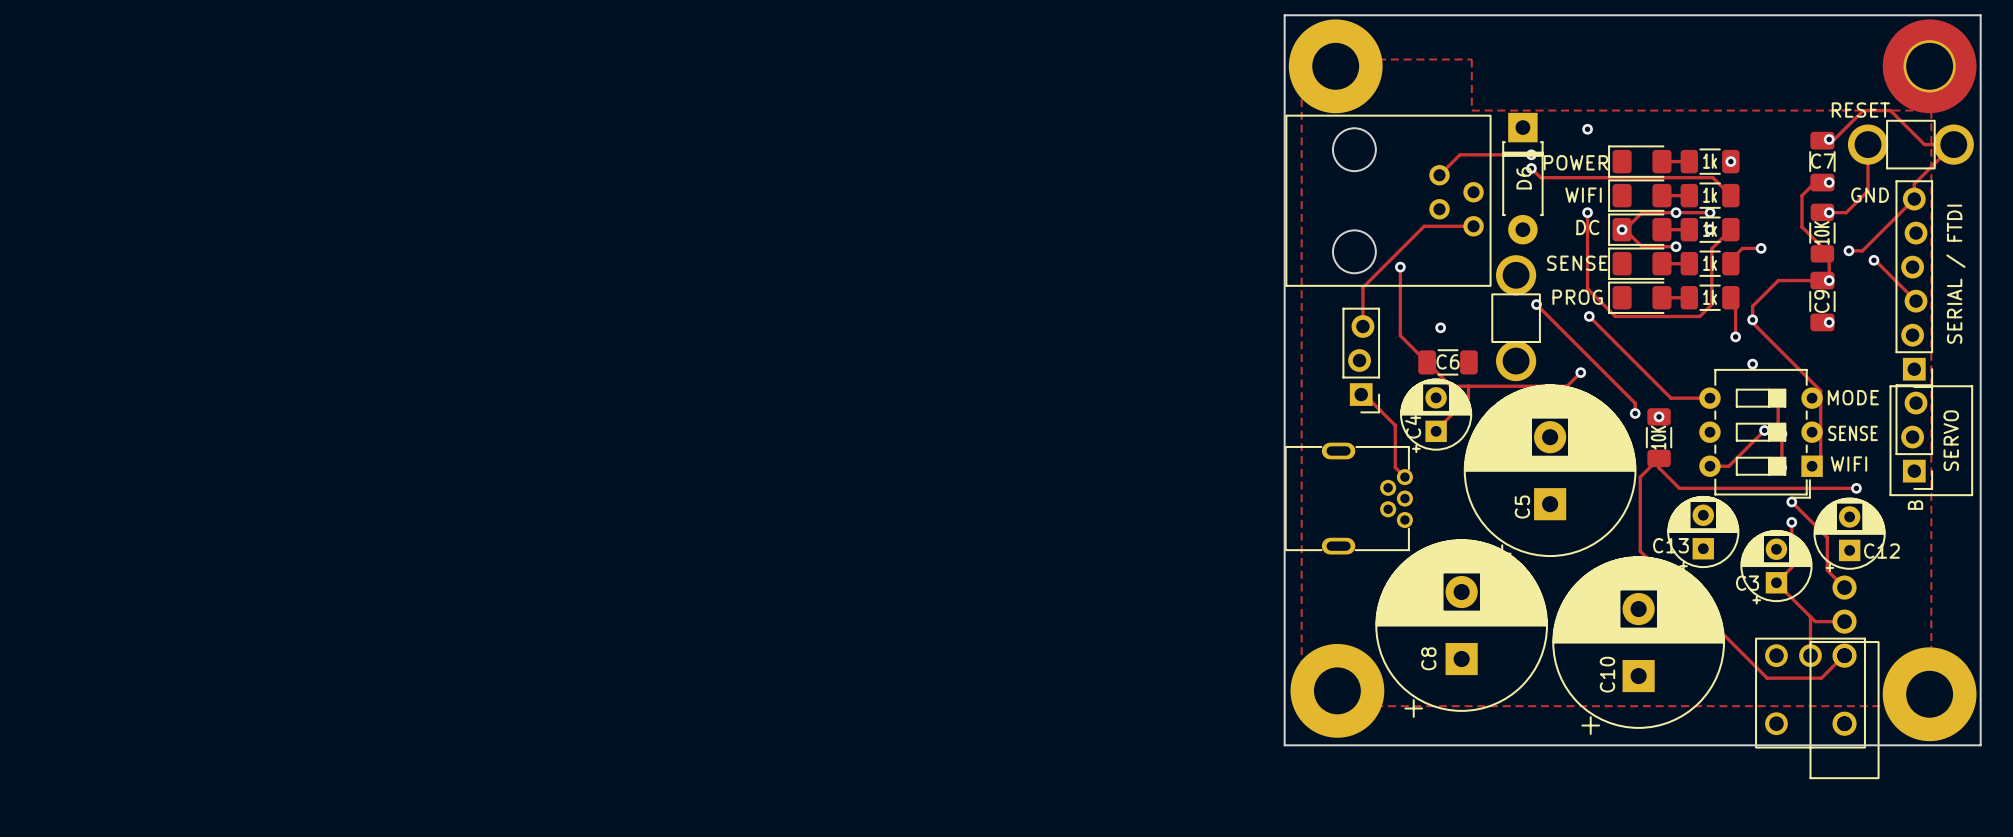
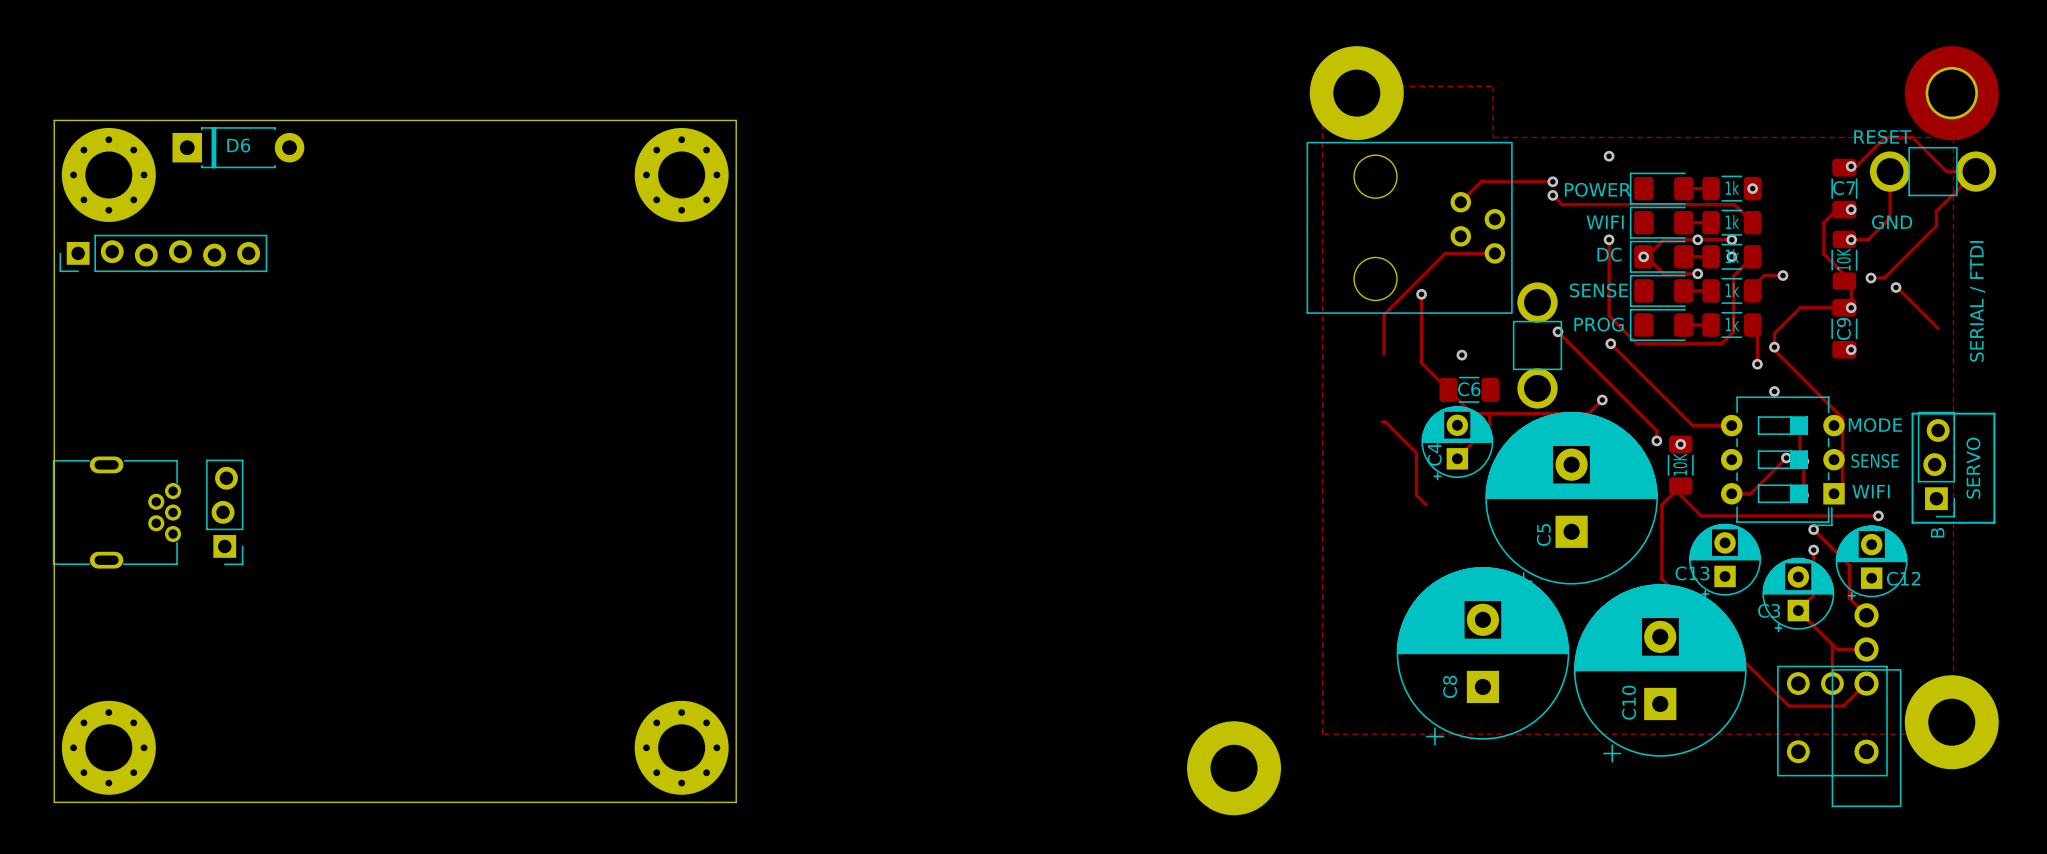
board edge: (1284, 15) (1980, 15) (1980, 745) (1284, 745) (1284, 15) -> none
board edge: none -> (54, 120) (736, 120) (736, 802) (54, 802) (54, 120)
part: none -> (108, 174)
part: none -> (681, 174)
D6 rotation: 0° (1522, 178) -> 90° counterclockwise (238, 147)
D6 position: (1522, 178) -> (238, 147)
part: none -> (163, 253)
part: (1914, 284) -> none
part: (1361, 360) -> none
part: none -> (116, 512)
part: none -> (224, 512)
part: (1348, 498) -> none
part position: (1337, 690) -> (1234, 768)
part: none -> (108, 747)
part: none -> (681, 747)

